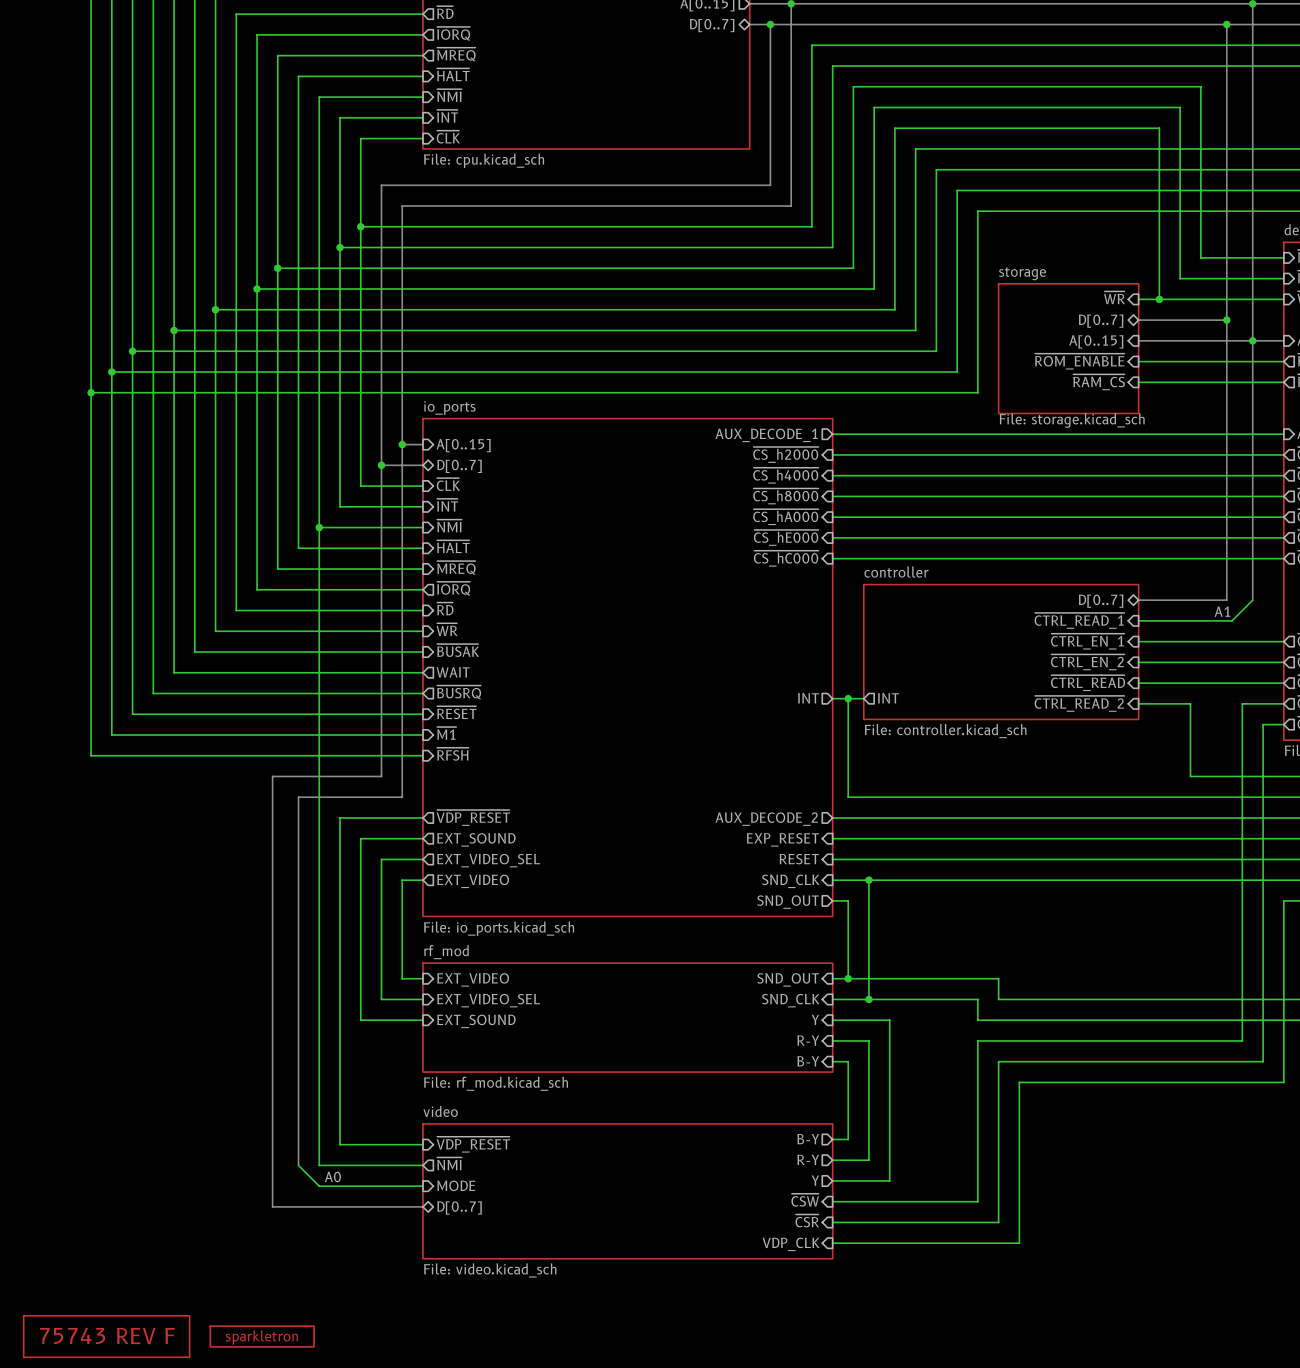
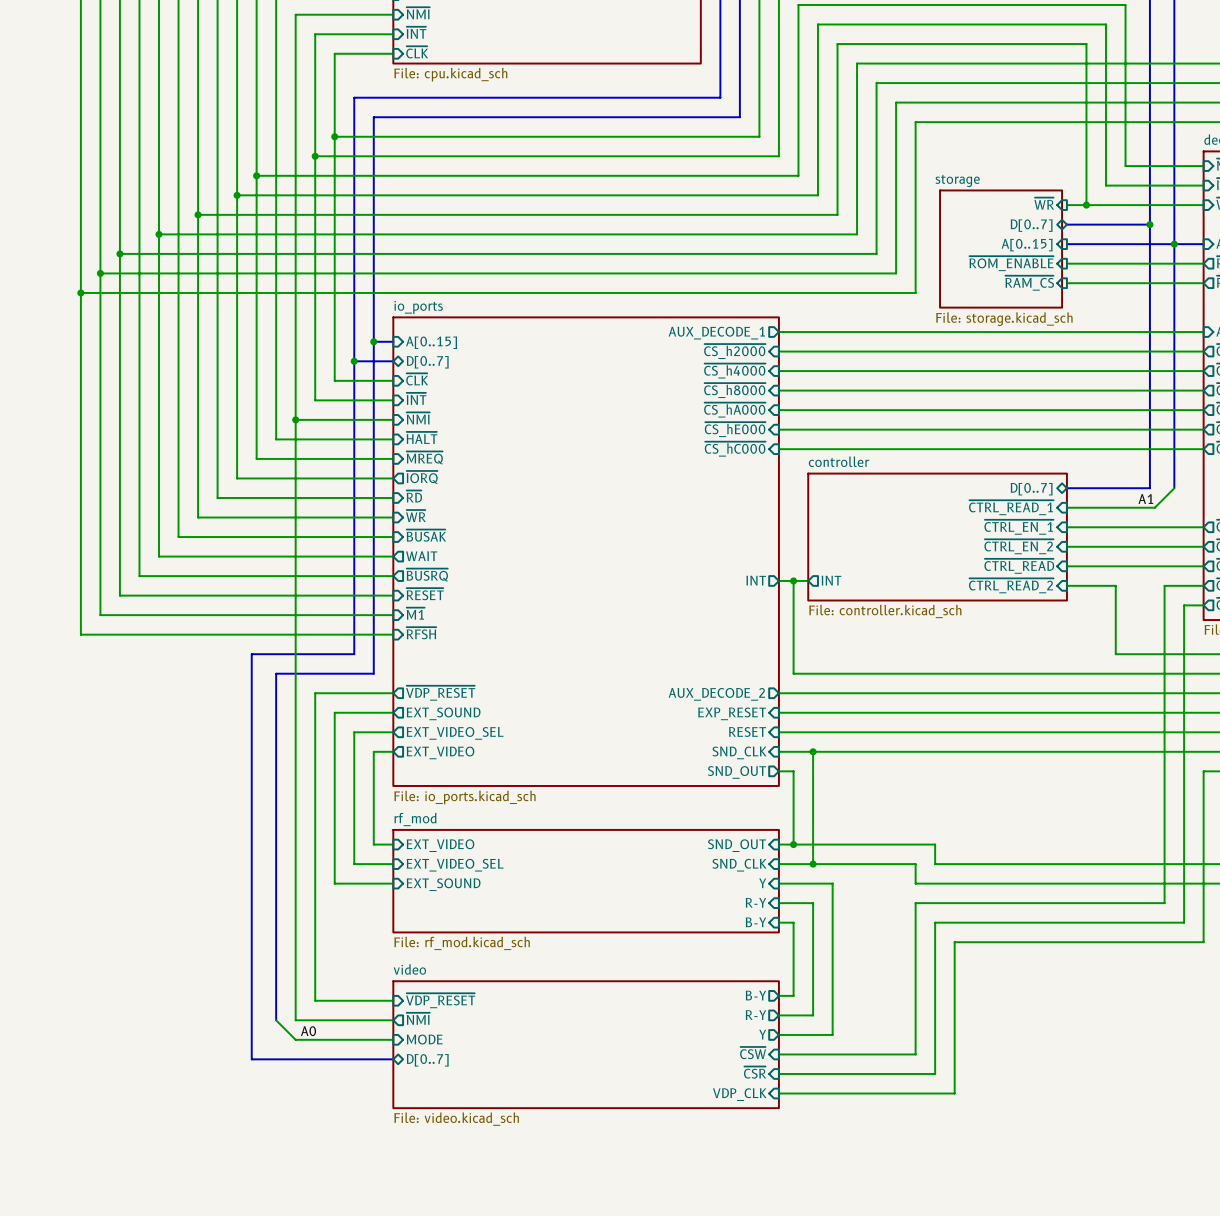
sheet storage shape: [998, 283, 1139, 414] -> [940, 190, 1063, 308]
part: (106, 1336) -> none
part: (262, 1336) -> none

